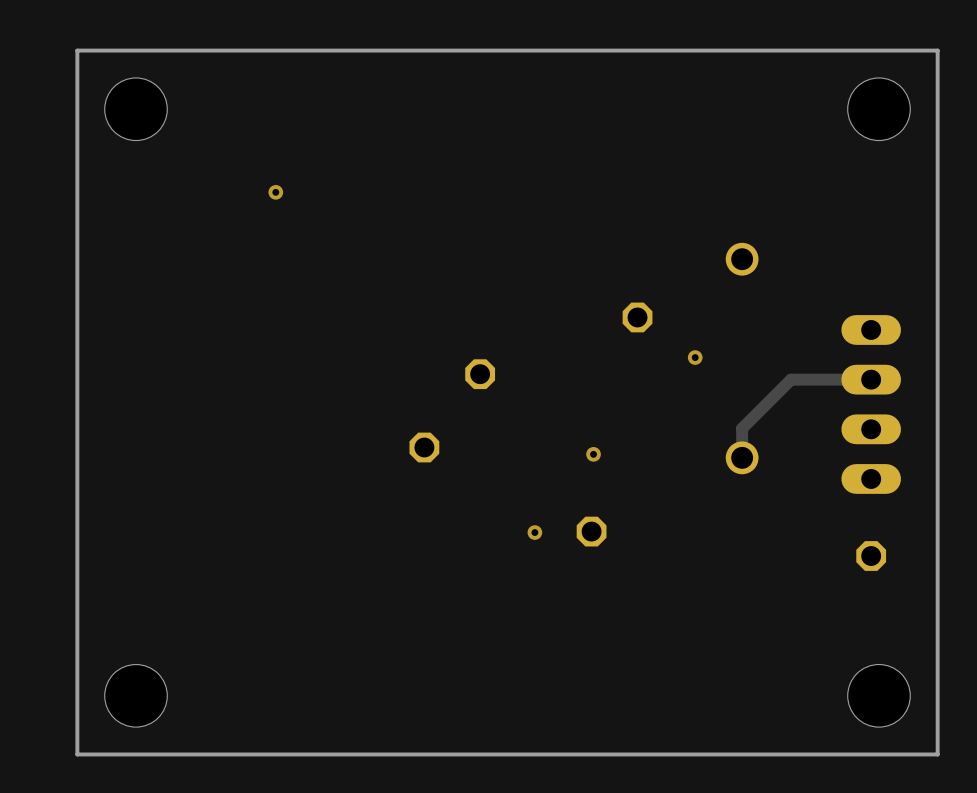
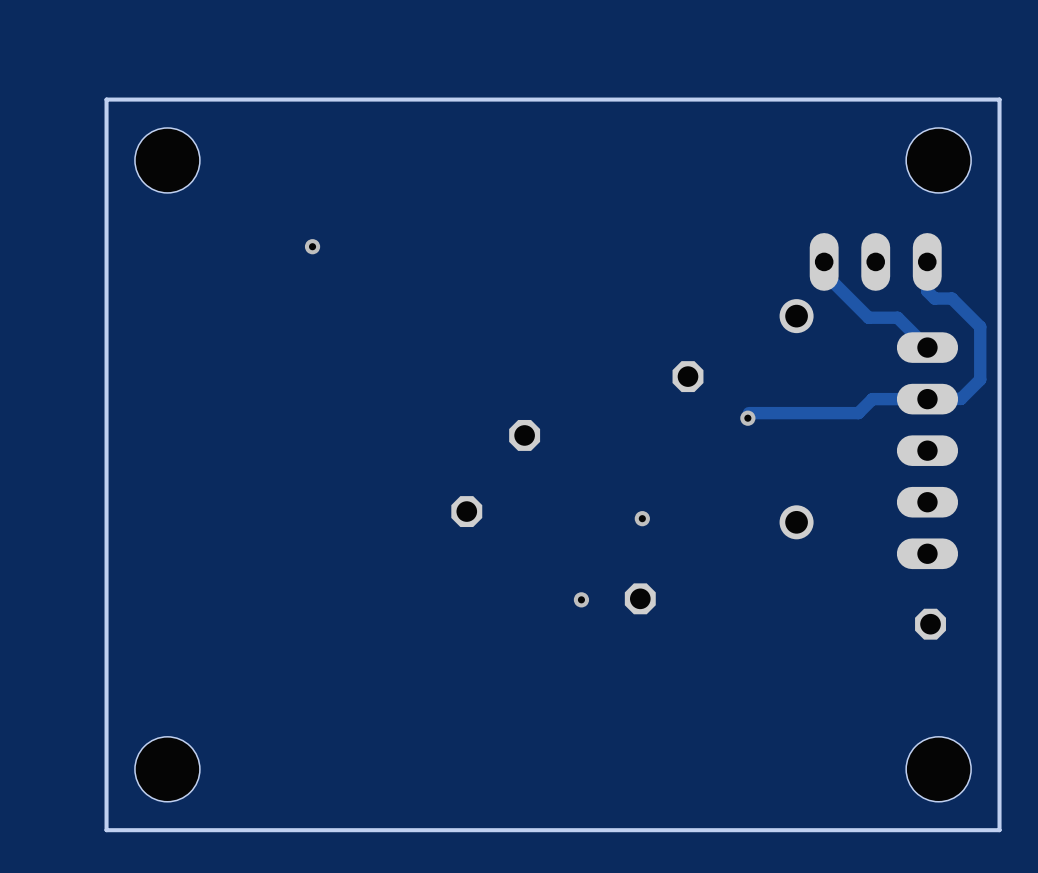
track: none -> (824, 261) (824, 273) (868, 317) (897, 317) (927, 347)
part: none -> (875, 261)
track: none -> (927, 261) (927, 291) (934, 298) (951, 298) (980, 326) (980, 379) (960, 398) (927, 398)
part footprint: [841, 315, 901, 494] -> [896, 332, 959, 570]
track: none -> (927, 399) (872, 399) (858, 413) (748, 413)
track: (871, 379) (791, 379) (742, 428) (742, 457) -> none

